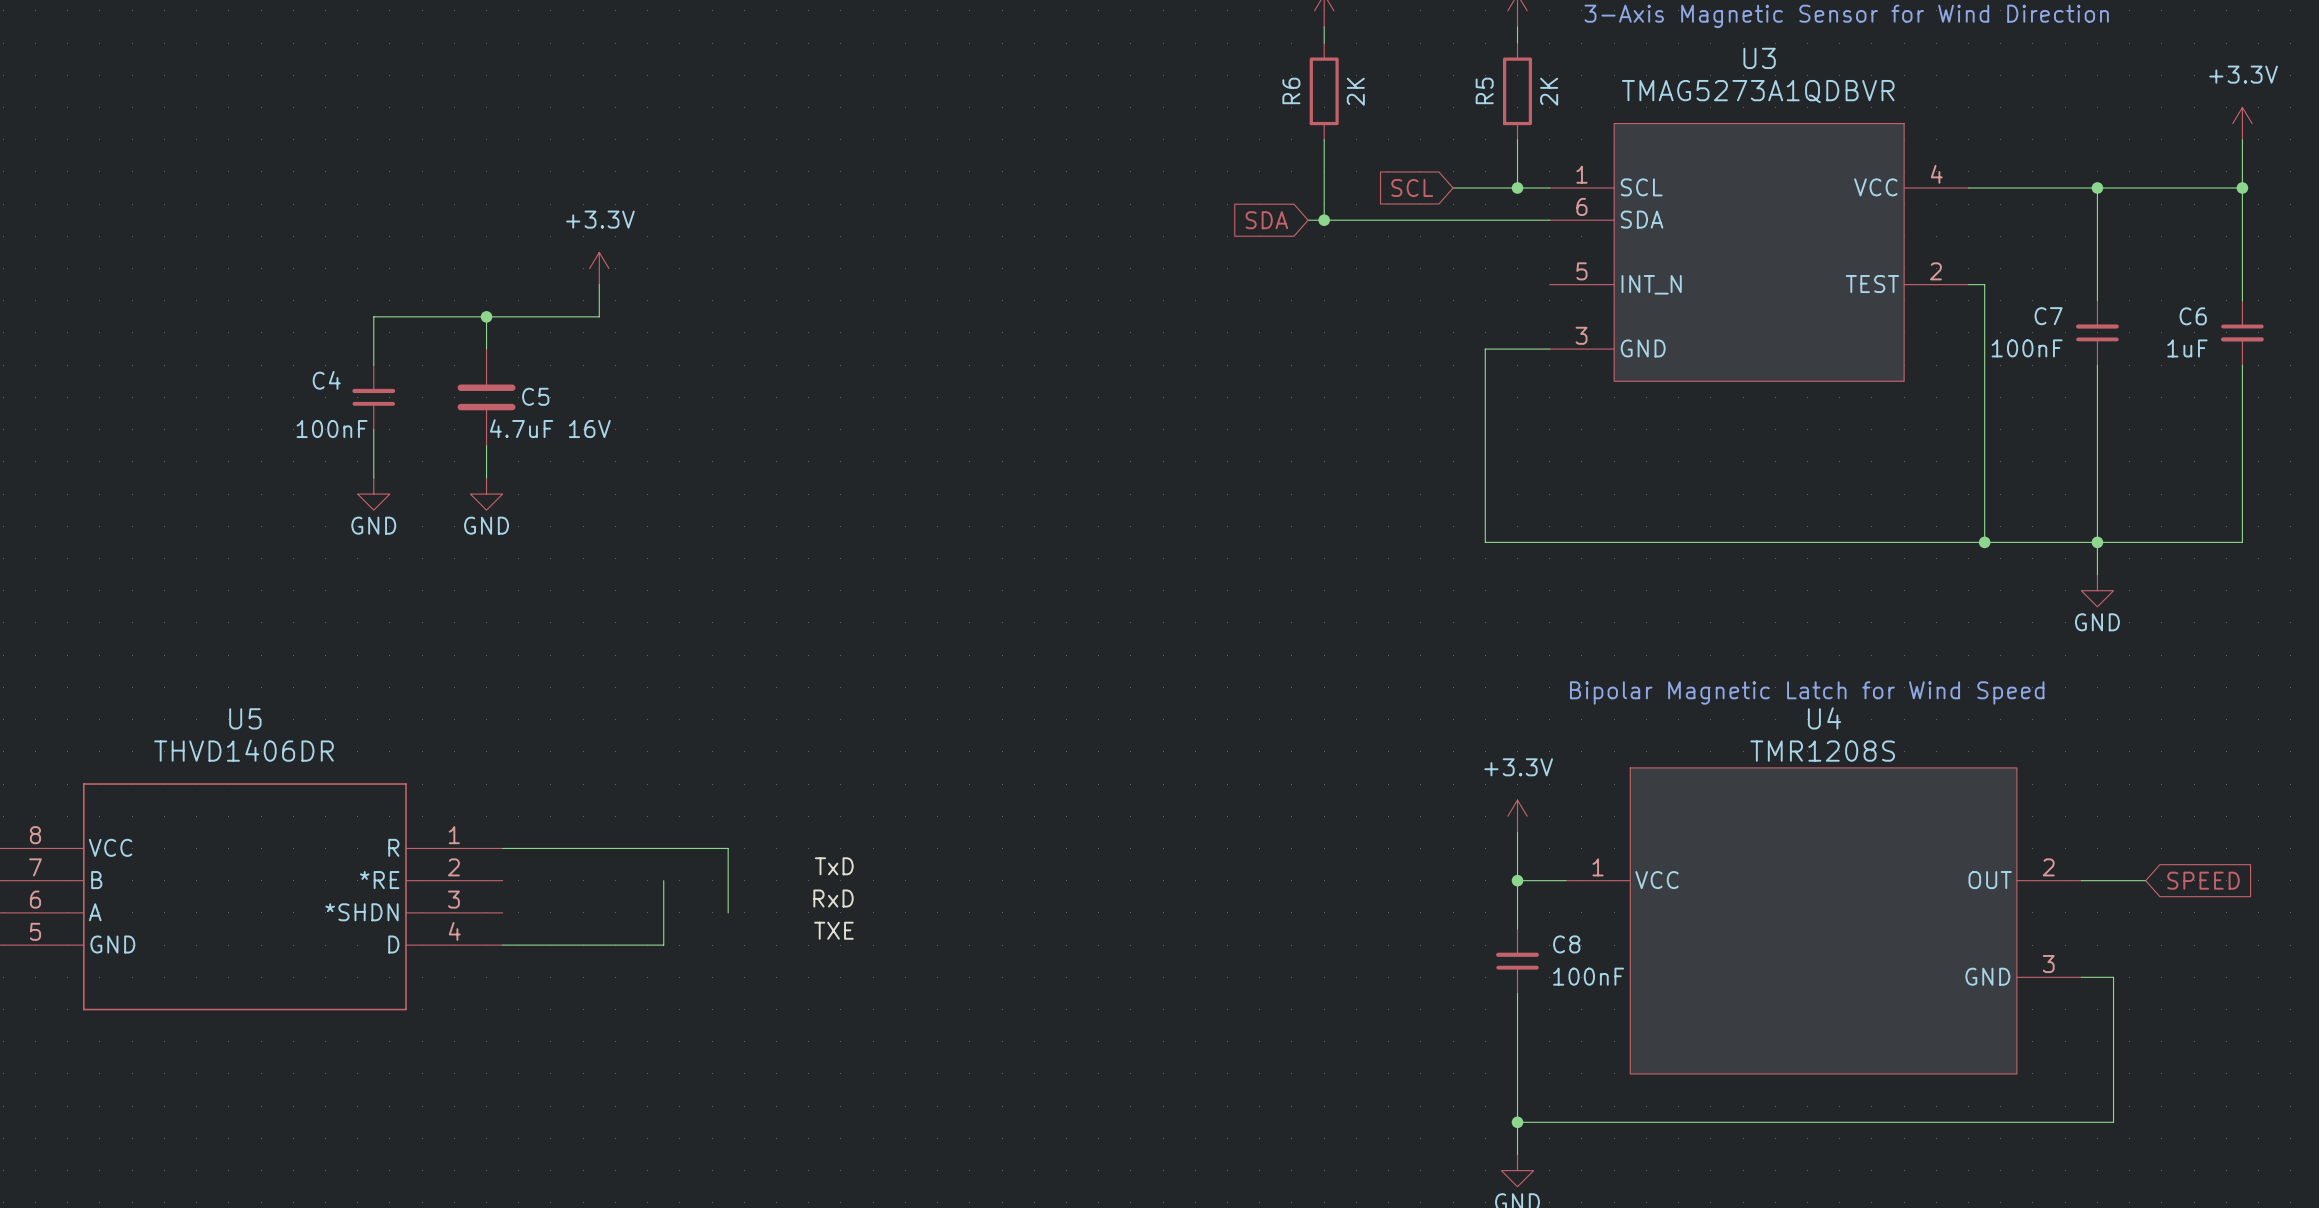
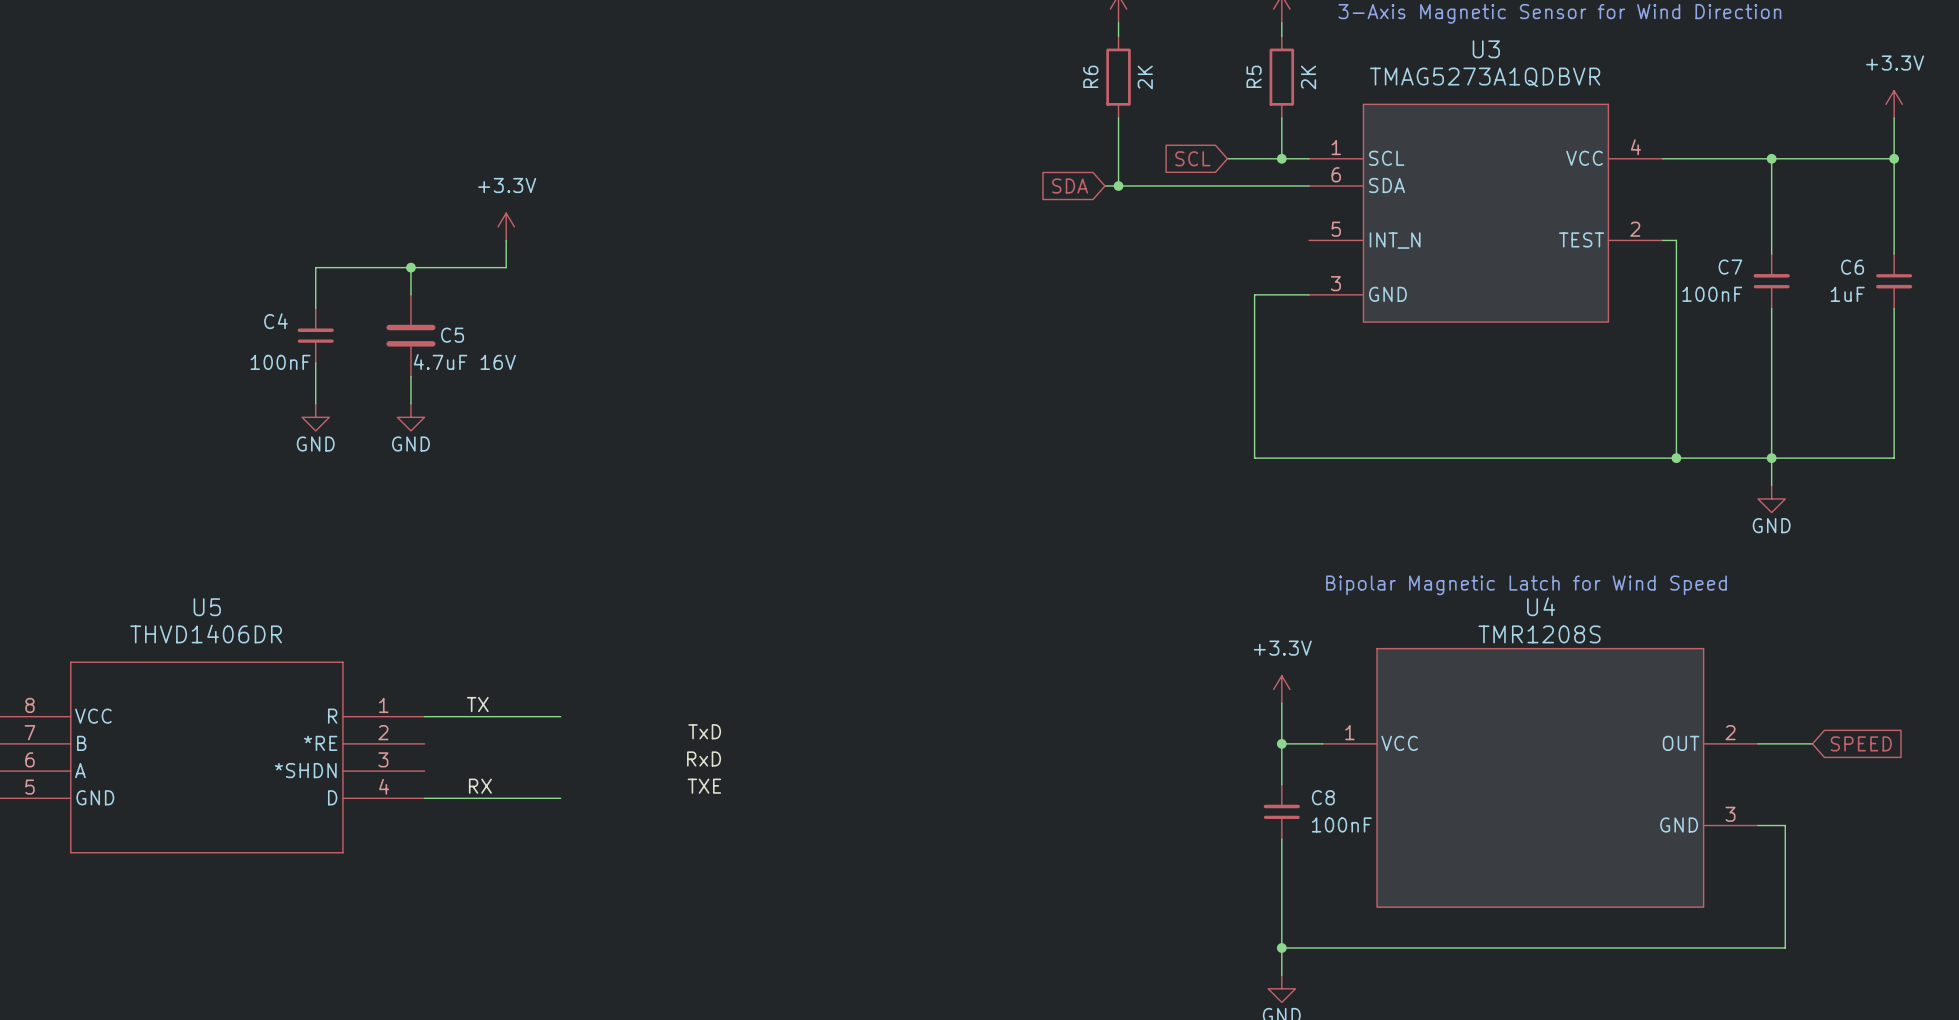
label: none -> TX (477, 704)
wire: (663, 848) (728, 848) (728, 912) -> none
wire: (663, 880) (663, 945) -> none
label: none -> RX (480, 786)

